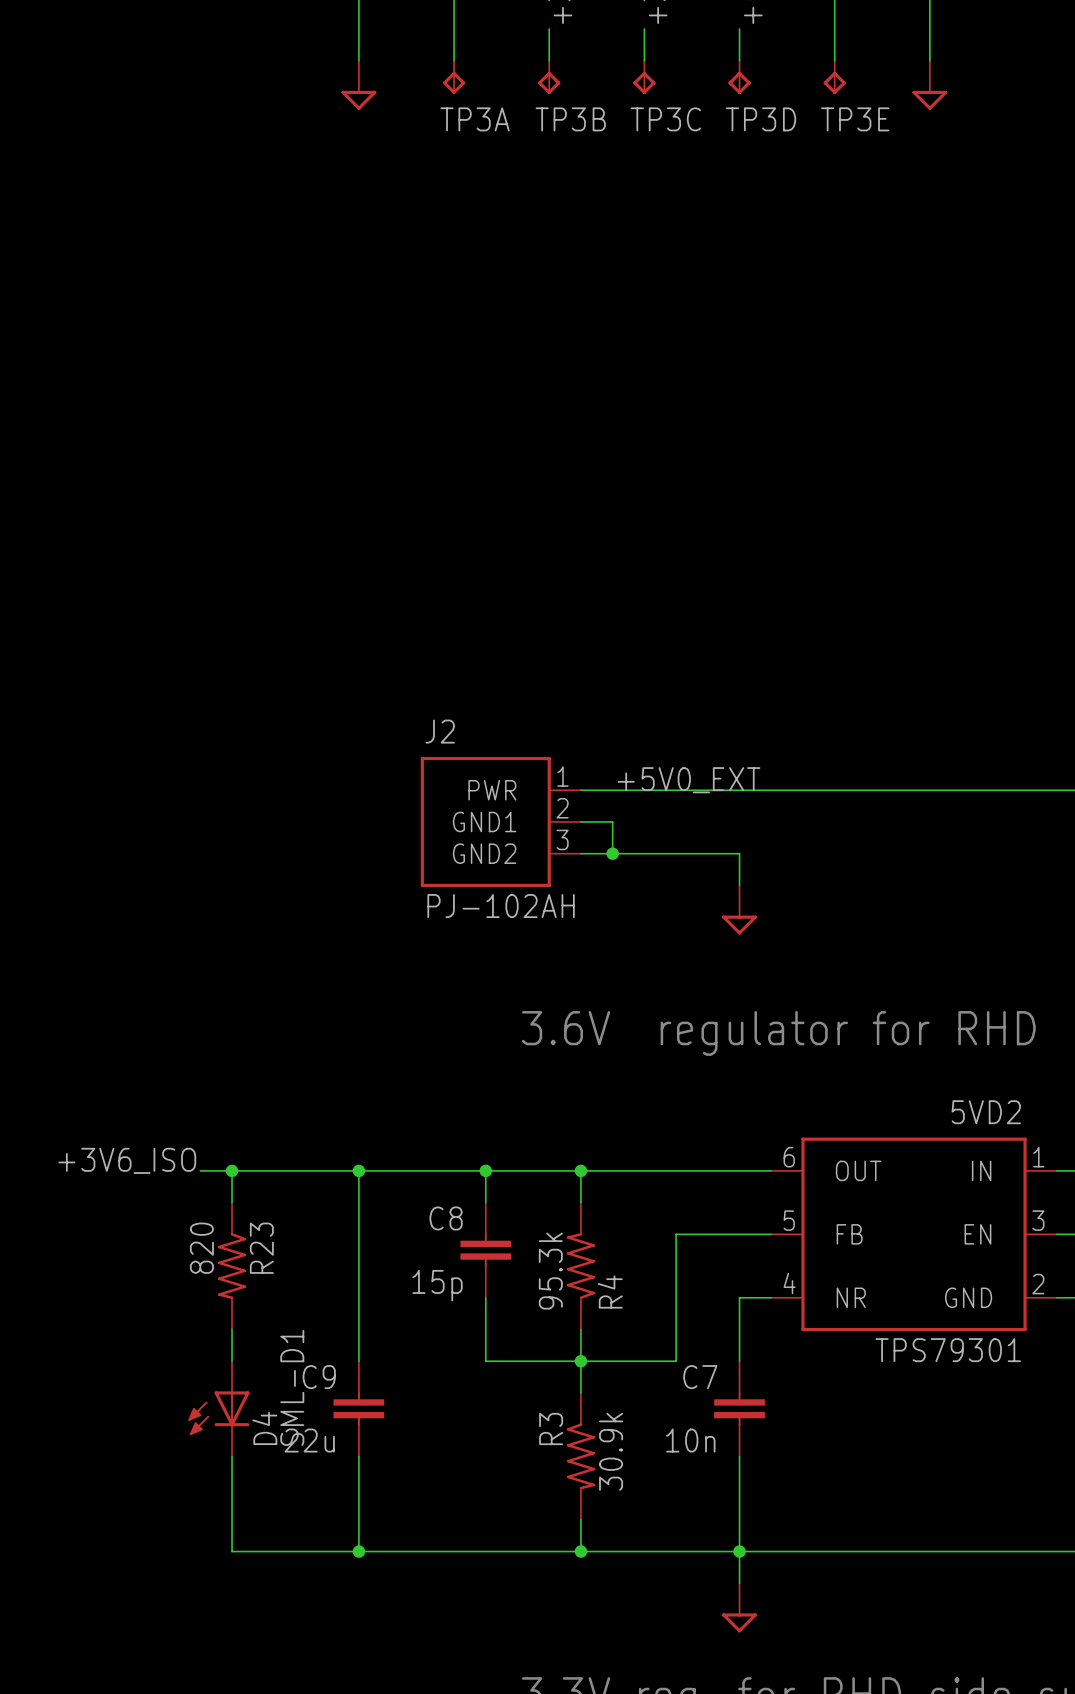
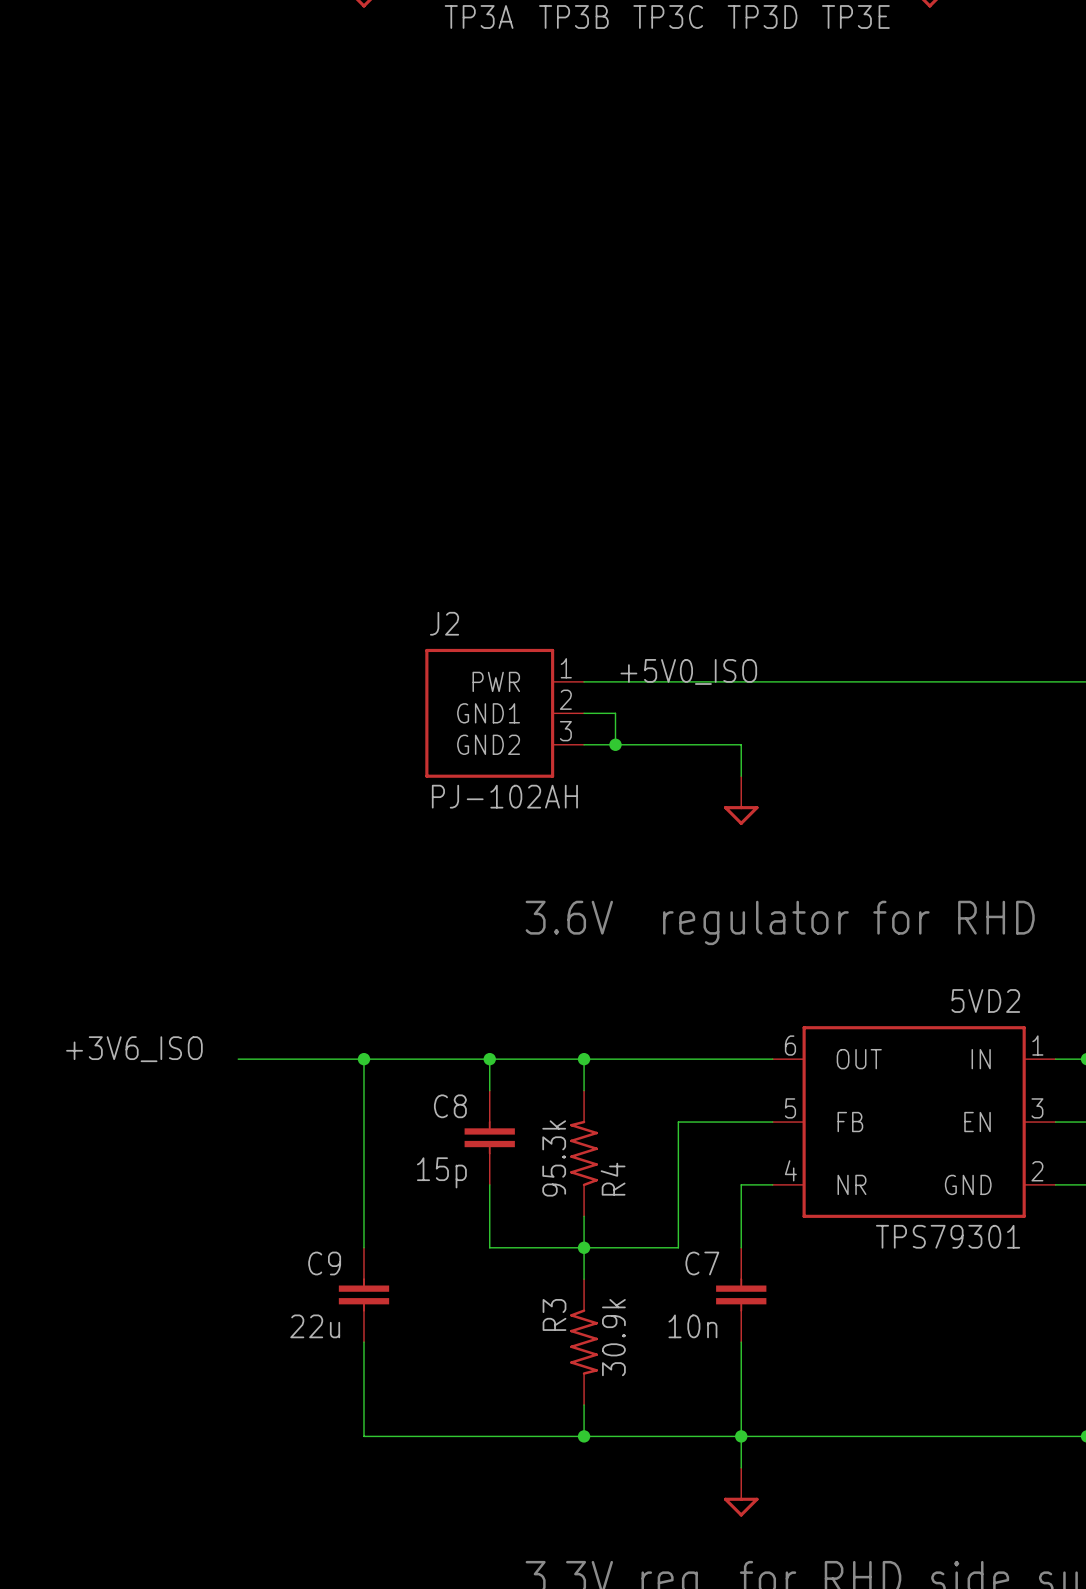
label: +5V0_EXT (689, 780) -> +5V0_ISO (688, 671)
wire: (200, 1170) (232, 1170) (232, 1202) -> none
junction: (232, 1170) -> none
R23: 820 (232, 1266) -> none
wire: (232, 1329) (232, 1361) -> none
D4: SML-D1 (218, 1408) -> none
wire: (232, 1456) (232, 1551) (358, 1551) -> none
junction: (358, 1551) -> none

